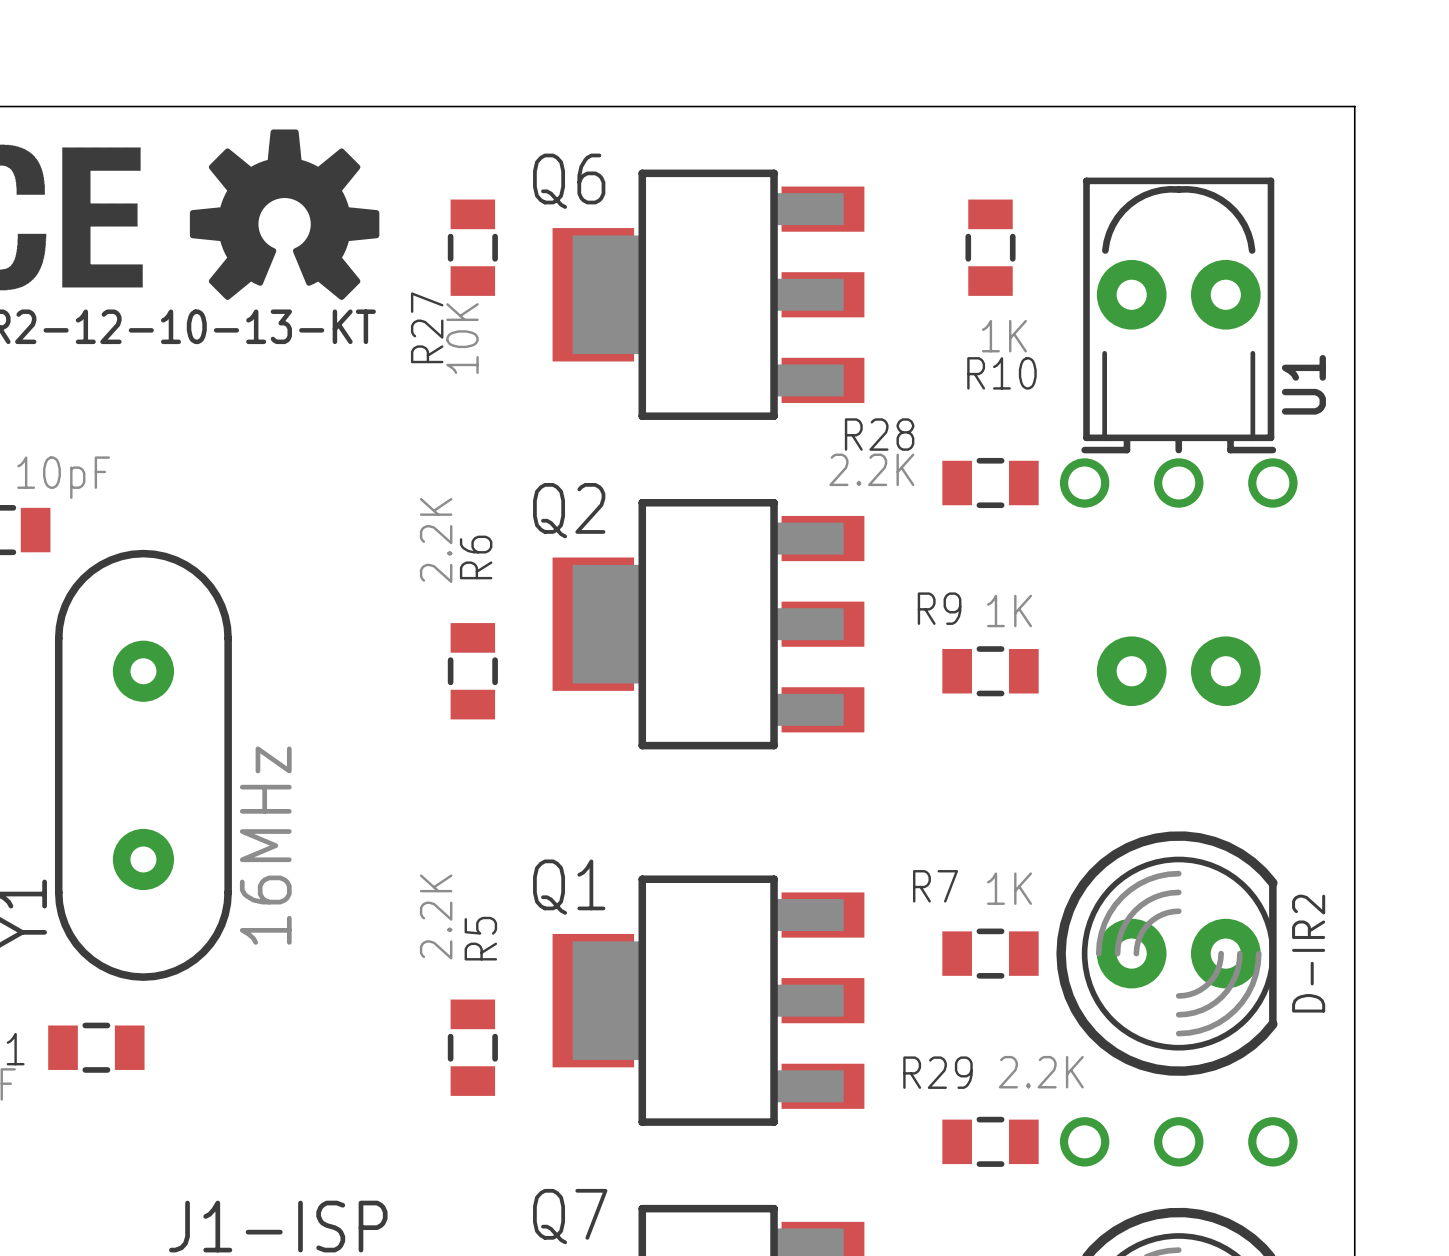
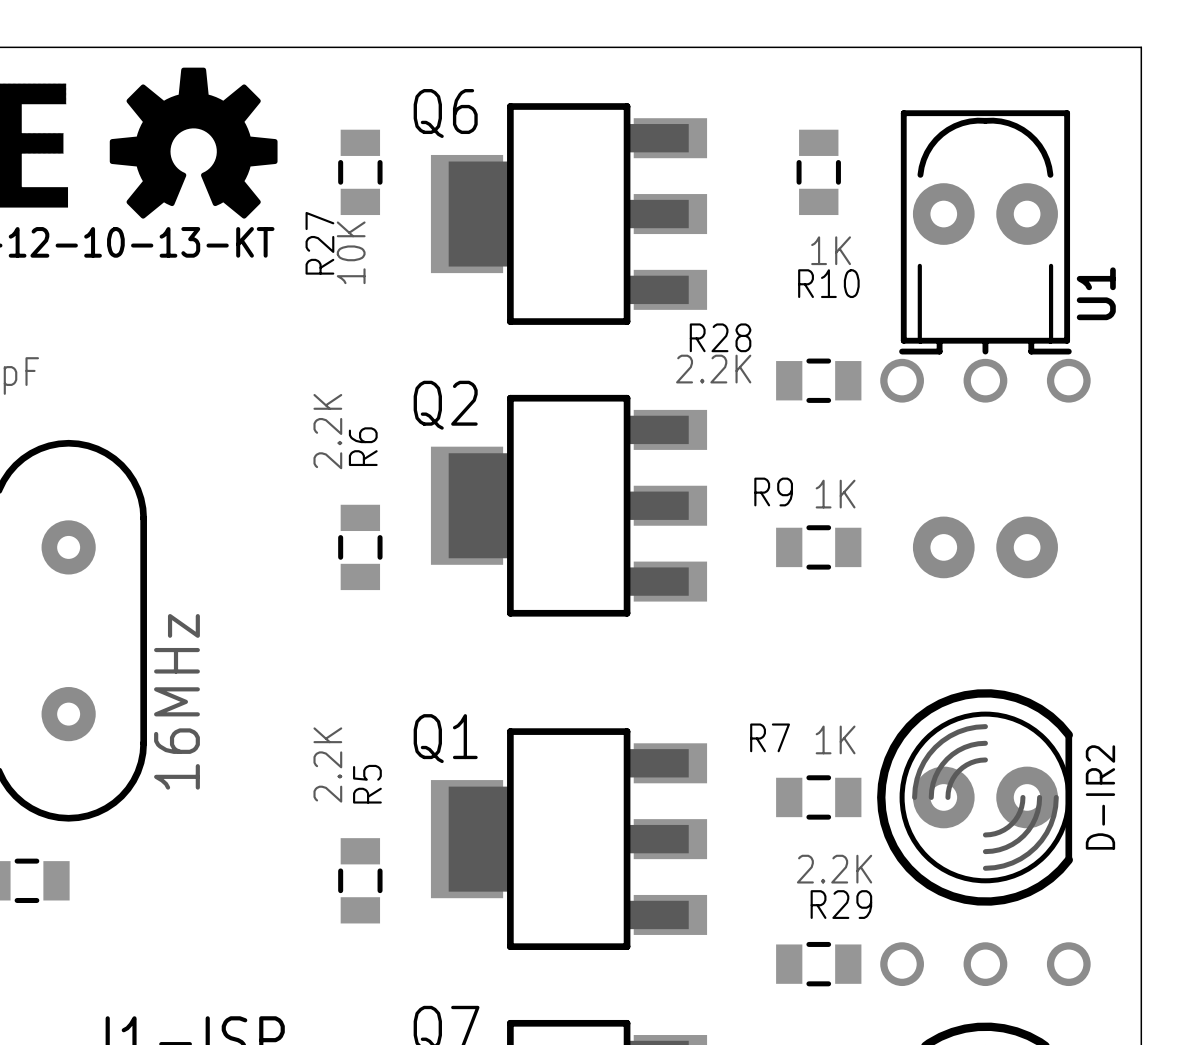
R29 name position: R29 (937, 1072) -> R29 (841, 904)
R29 value position: 2.2K (1041, 1072) -> 2.2K (834, 869)

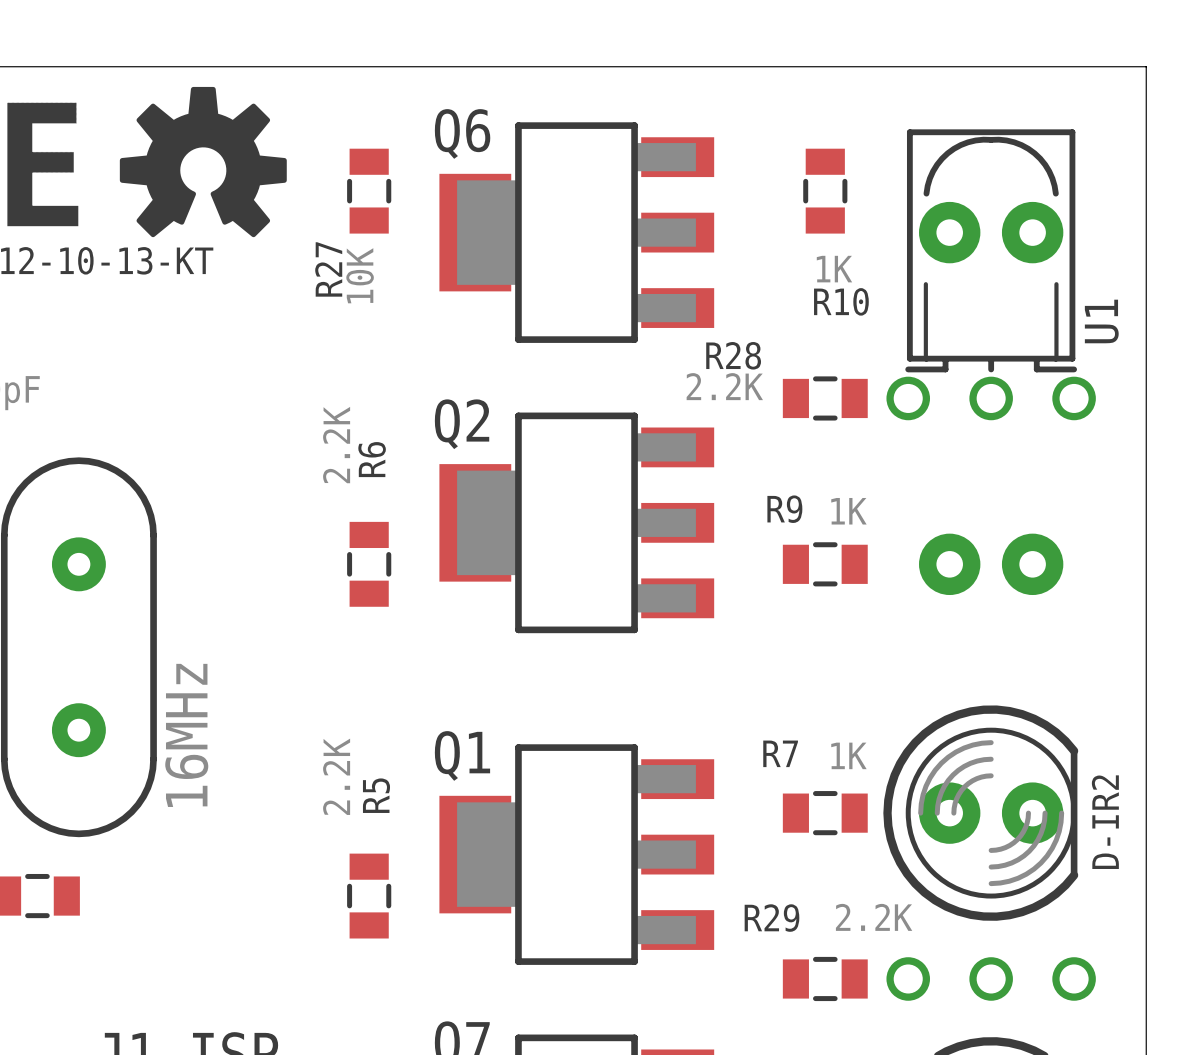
R29 value position: 2.2K (834, 869) -> 2.2K (874, 917)
R29 name position: R29 (841, 904) -> R29 (771, 918)

